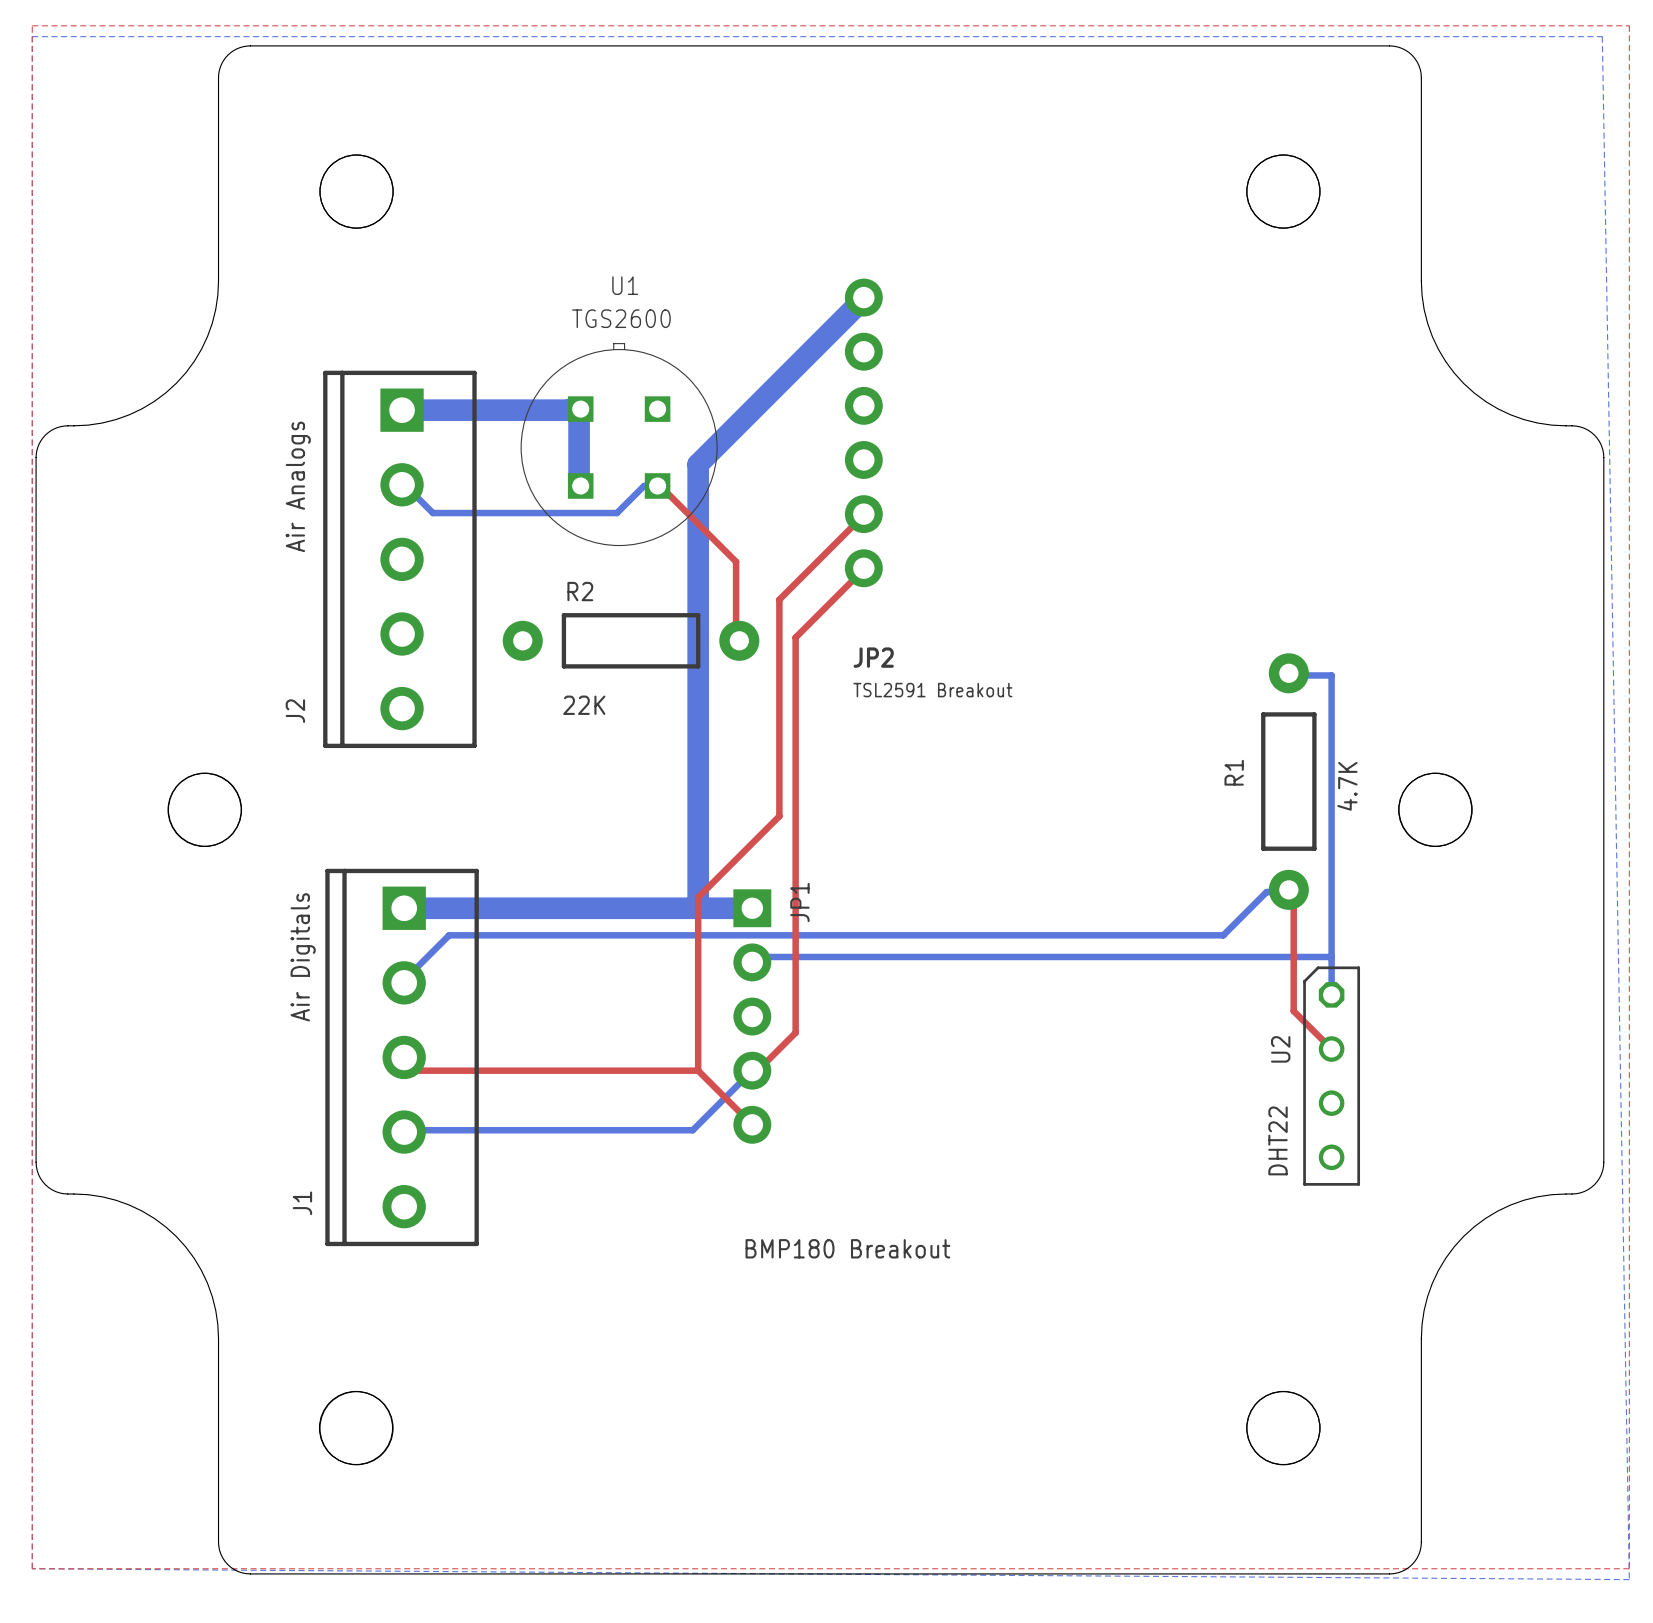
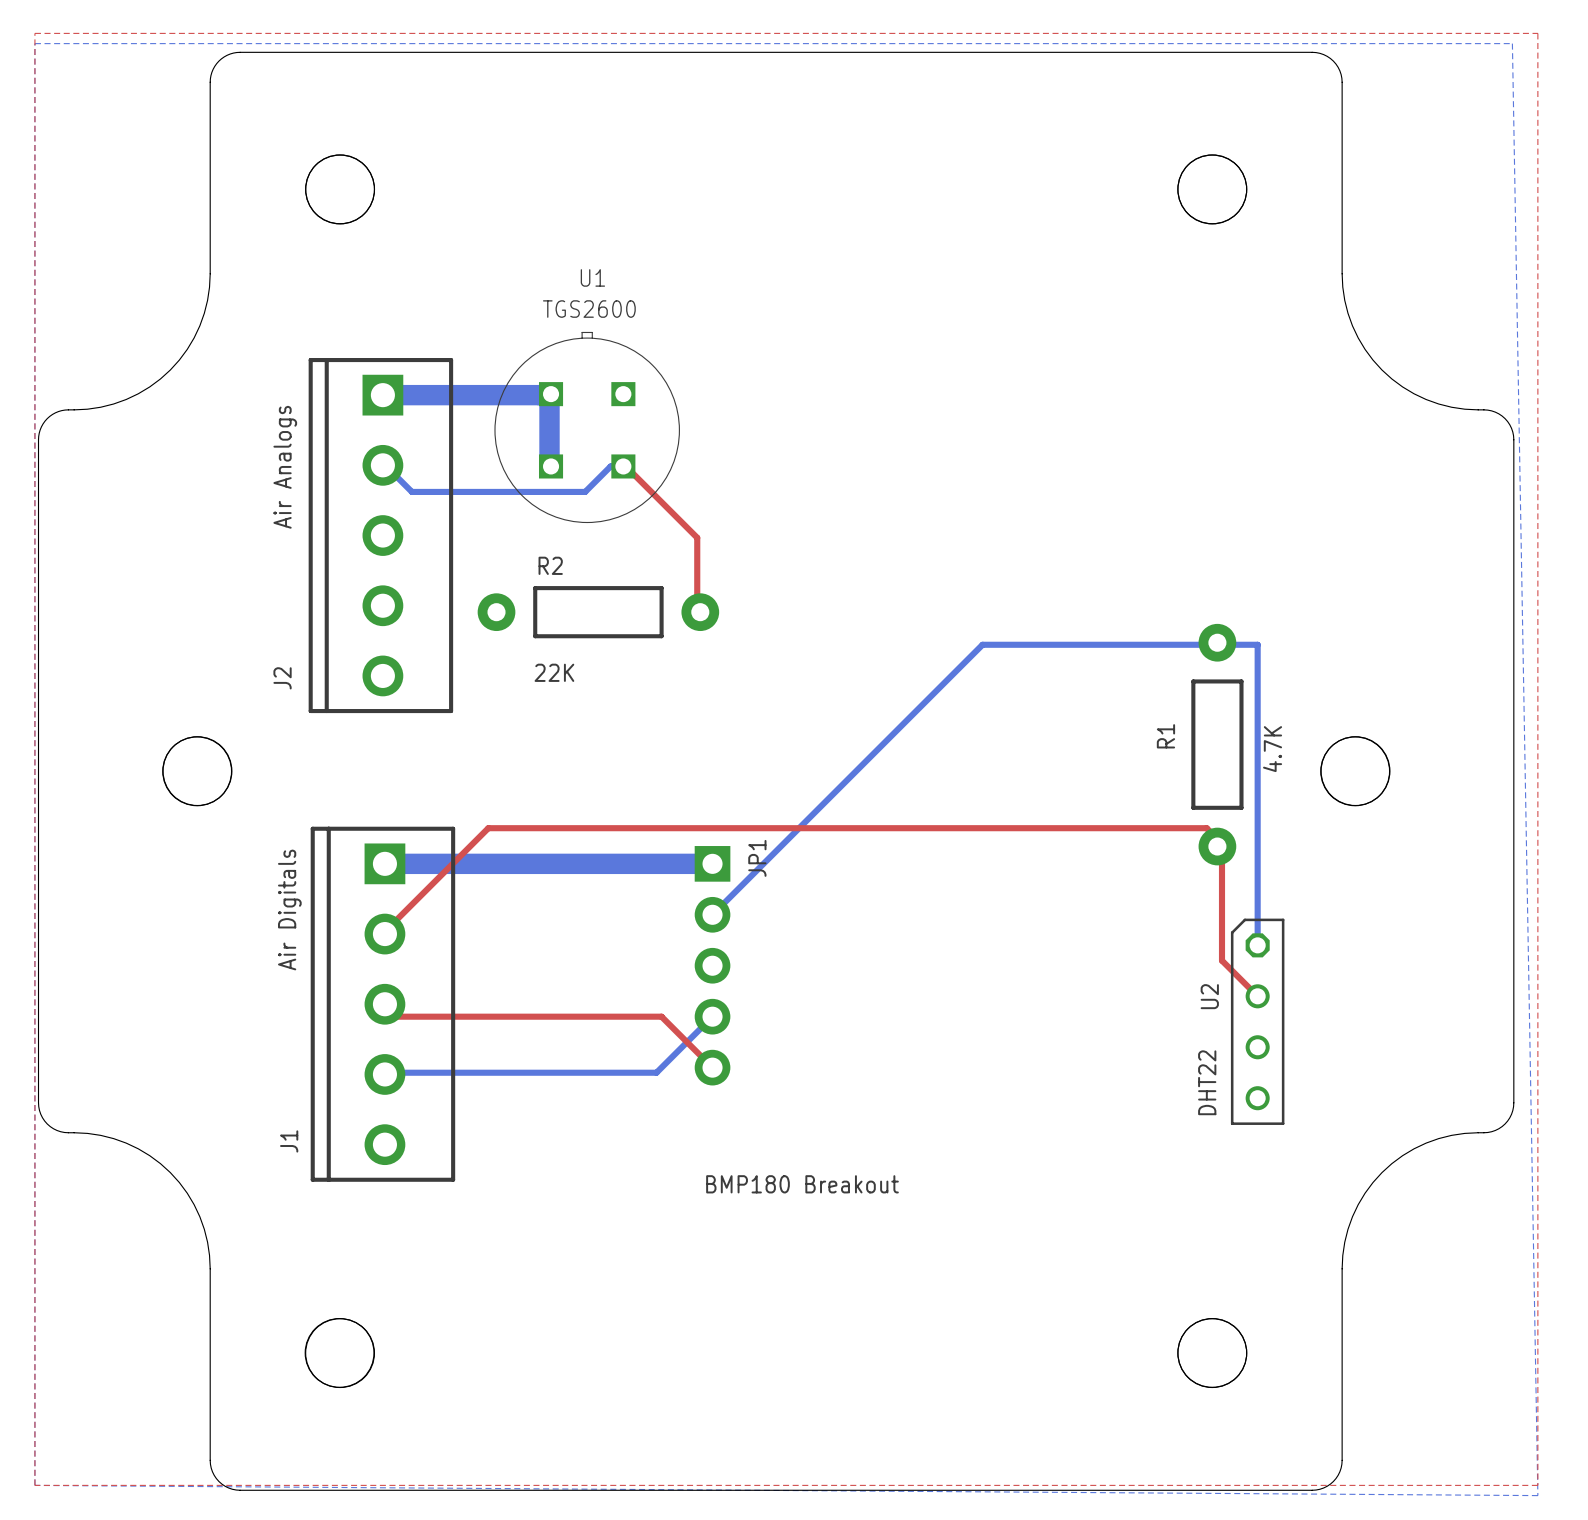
bottom track: (863, 297) (698, 464) (698, 908) -> none
JP2: TSL2591 Breakout (863, 432) -> none
top track: (863, 514) (779, 599) (779, 816) (698, 897) (698, 1070) -> none
top track: (863, 568) (795, 637) (795, 1032) (757, 1070) (752, 1070) -> none
bottom track: (1288, 889) (1288, 892) (1266, 892) (1223, 935) (449, 935) (405, 978) (404, 982) -> none
top track: none -> (1217, 846) (1216, 838) (1206, 828) (488, 828) (386, 930) (384, 934)
bottom track: (757, 956) (1331, 956) -> (717, 909) (982, 644) (1216, 644) (1217, 642)

